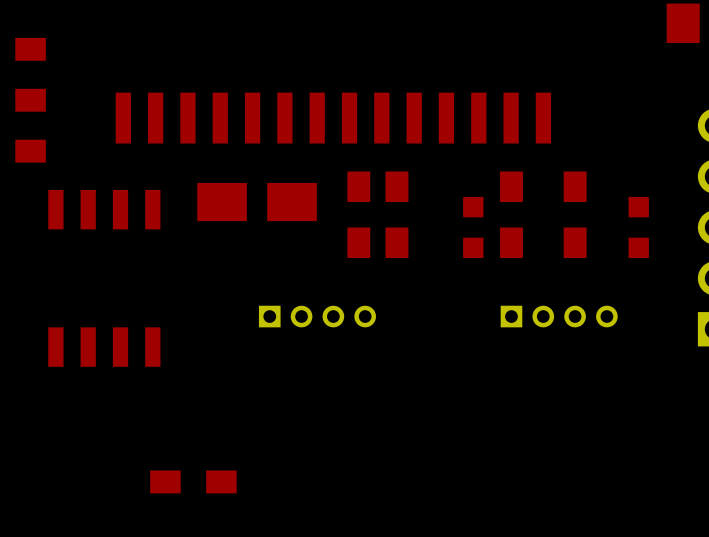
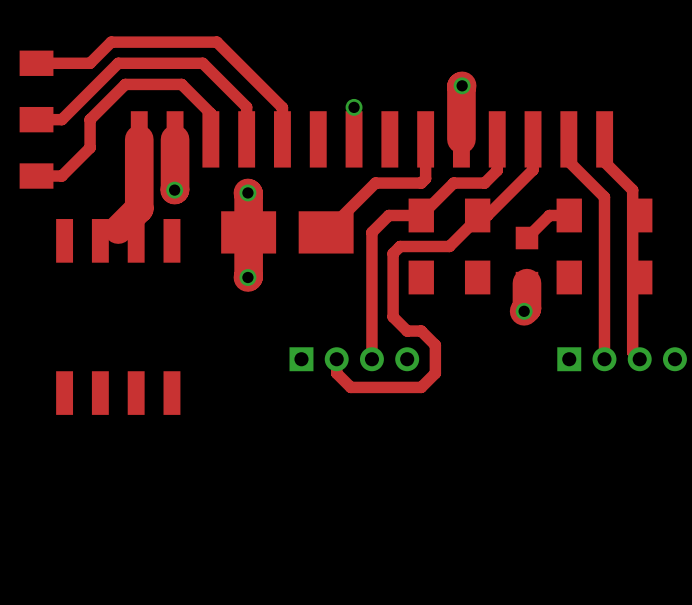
top track: none -> (36, 63) (90, 63) (111, 42) (216, 42) (282, 107) (282, 139)
top track: none -> (462, 85) (461, 139)
via: none -> (462, 85)
via: none -> (354, 107)
top track: none -> (36, 119) (61, 119) (118, 63) (202, 63) (246, 107) (246, 139)
top track: none -> (139, 139) (139, 208) (118, 229)
top track: none -> (175, 139) (174, 190)
top track: none -> (210, 139) (210, 113) (181, 84) (125, 84) (90, 119) (90, 147) (61, 176) (36, 176)
top track: none -> (425, 139) (425, 178) (421, 183) (375, 183) (326, 232)
top track: none -> (497, 139) (497, 170) (484, 183) (453, 183) (421, 215) (388, 215) (371, 232) (371, 359)
top track: none -> (533, 139) (533, 169) (487, 215) (477, 215) (477, 218) (449, 246) (400, 246) (393, 253) (393, 316) (407, 331) (421, 331) (435, 345) (435, 373) (421, 387) (350, 387) (336, 373) (336, 359)
top track: none -> (568, 139) (568, 161) (604, 197) (604, 359)
top track: none -> (604, 139) (604, 162) (632, 190) (632, 352) (639, 359)
via: none -> (174, 190)
top track: none -> (247, 192) (247, 277)
via: none -> (247, 192)
top track: none -> (569, 215) (549, 215) (526, 238)
part: (358, 214) -> none
part: none -> (421, 246)
part: (396, 214) -> none
part: none -> (477, 246)
via: none -> (247, 277)
top track: none -> (526, 283) (526, 308) (524, 311)
via: none -> (524, 311)
part: (193, 481) -> none

